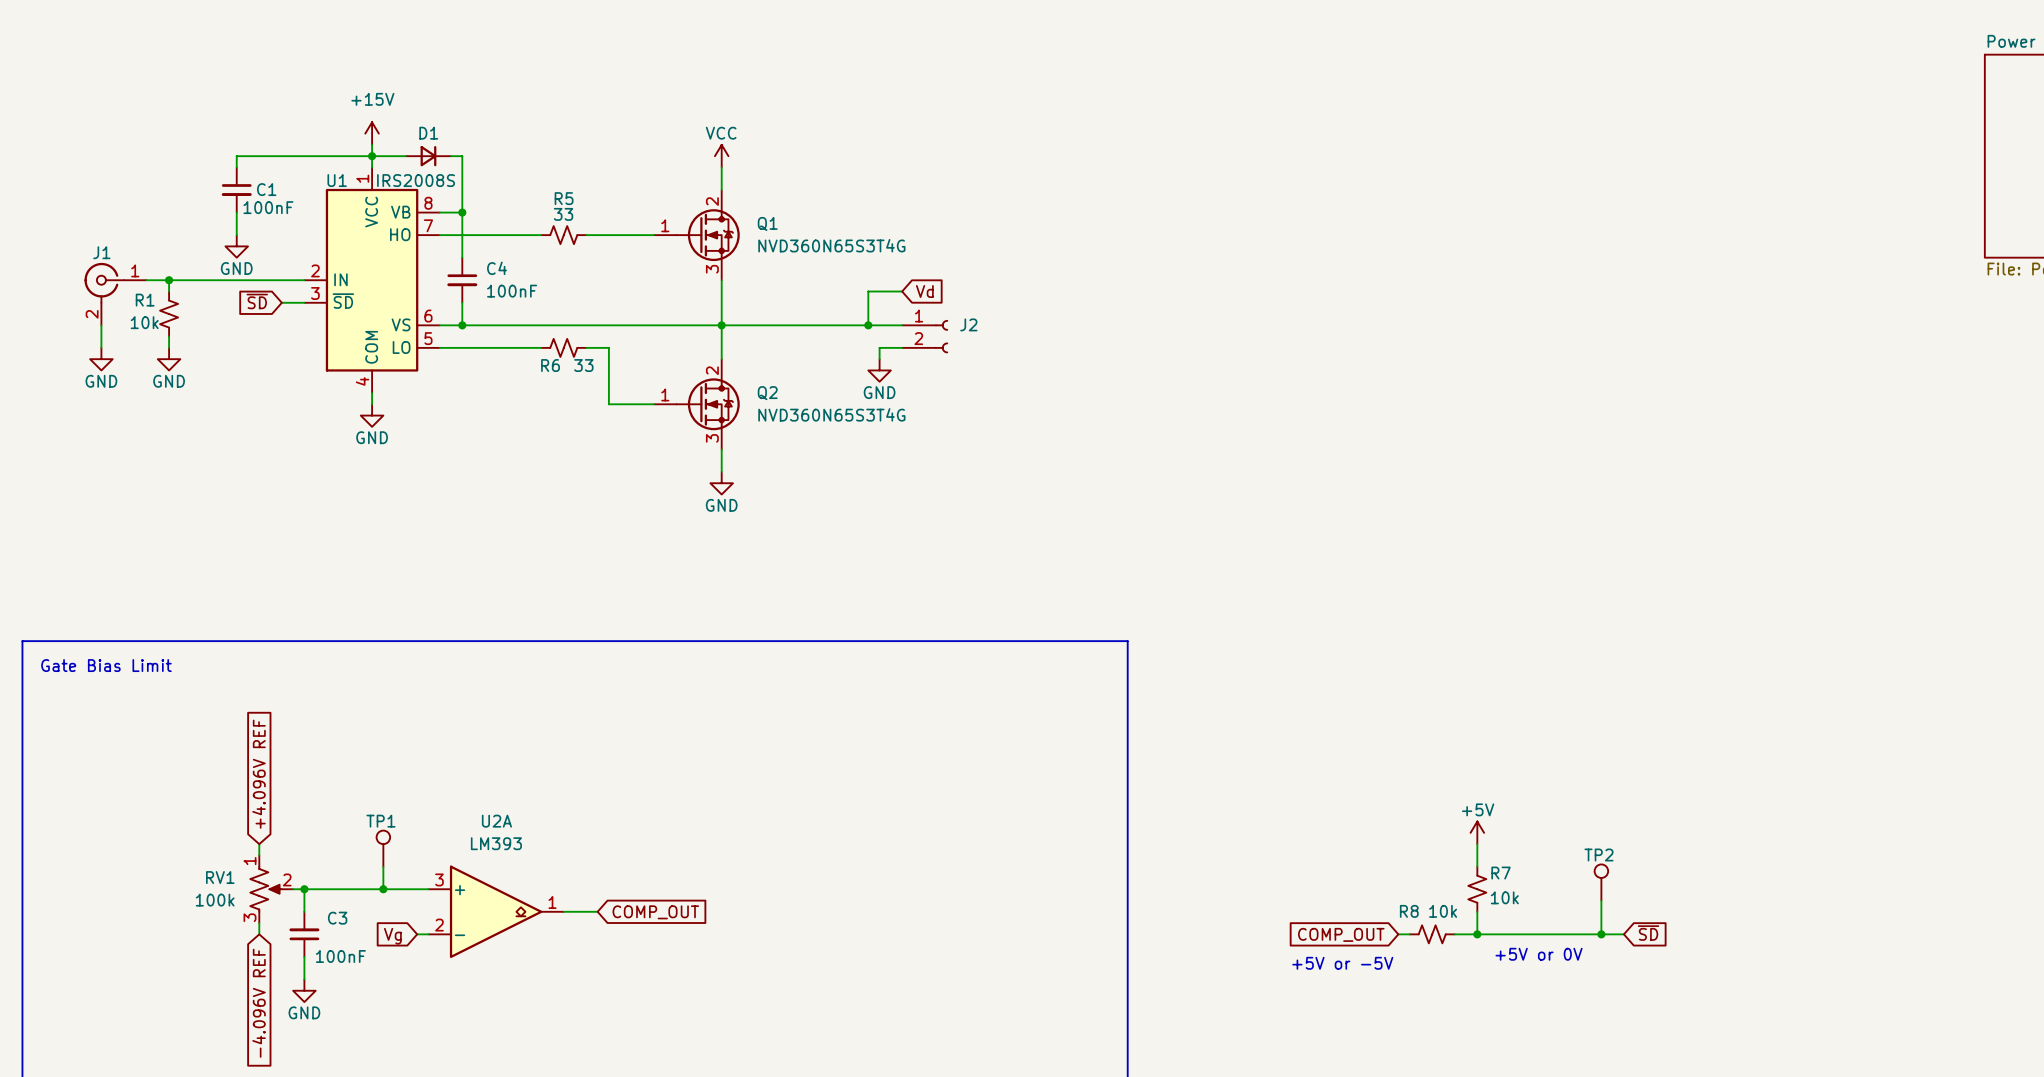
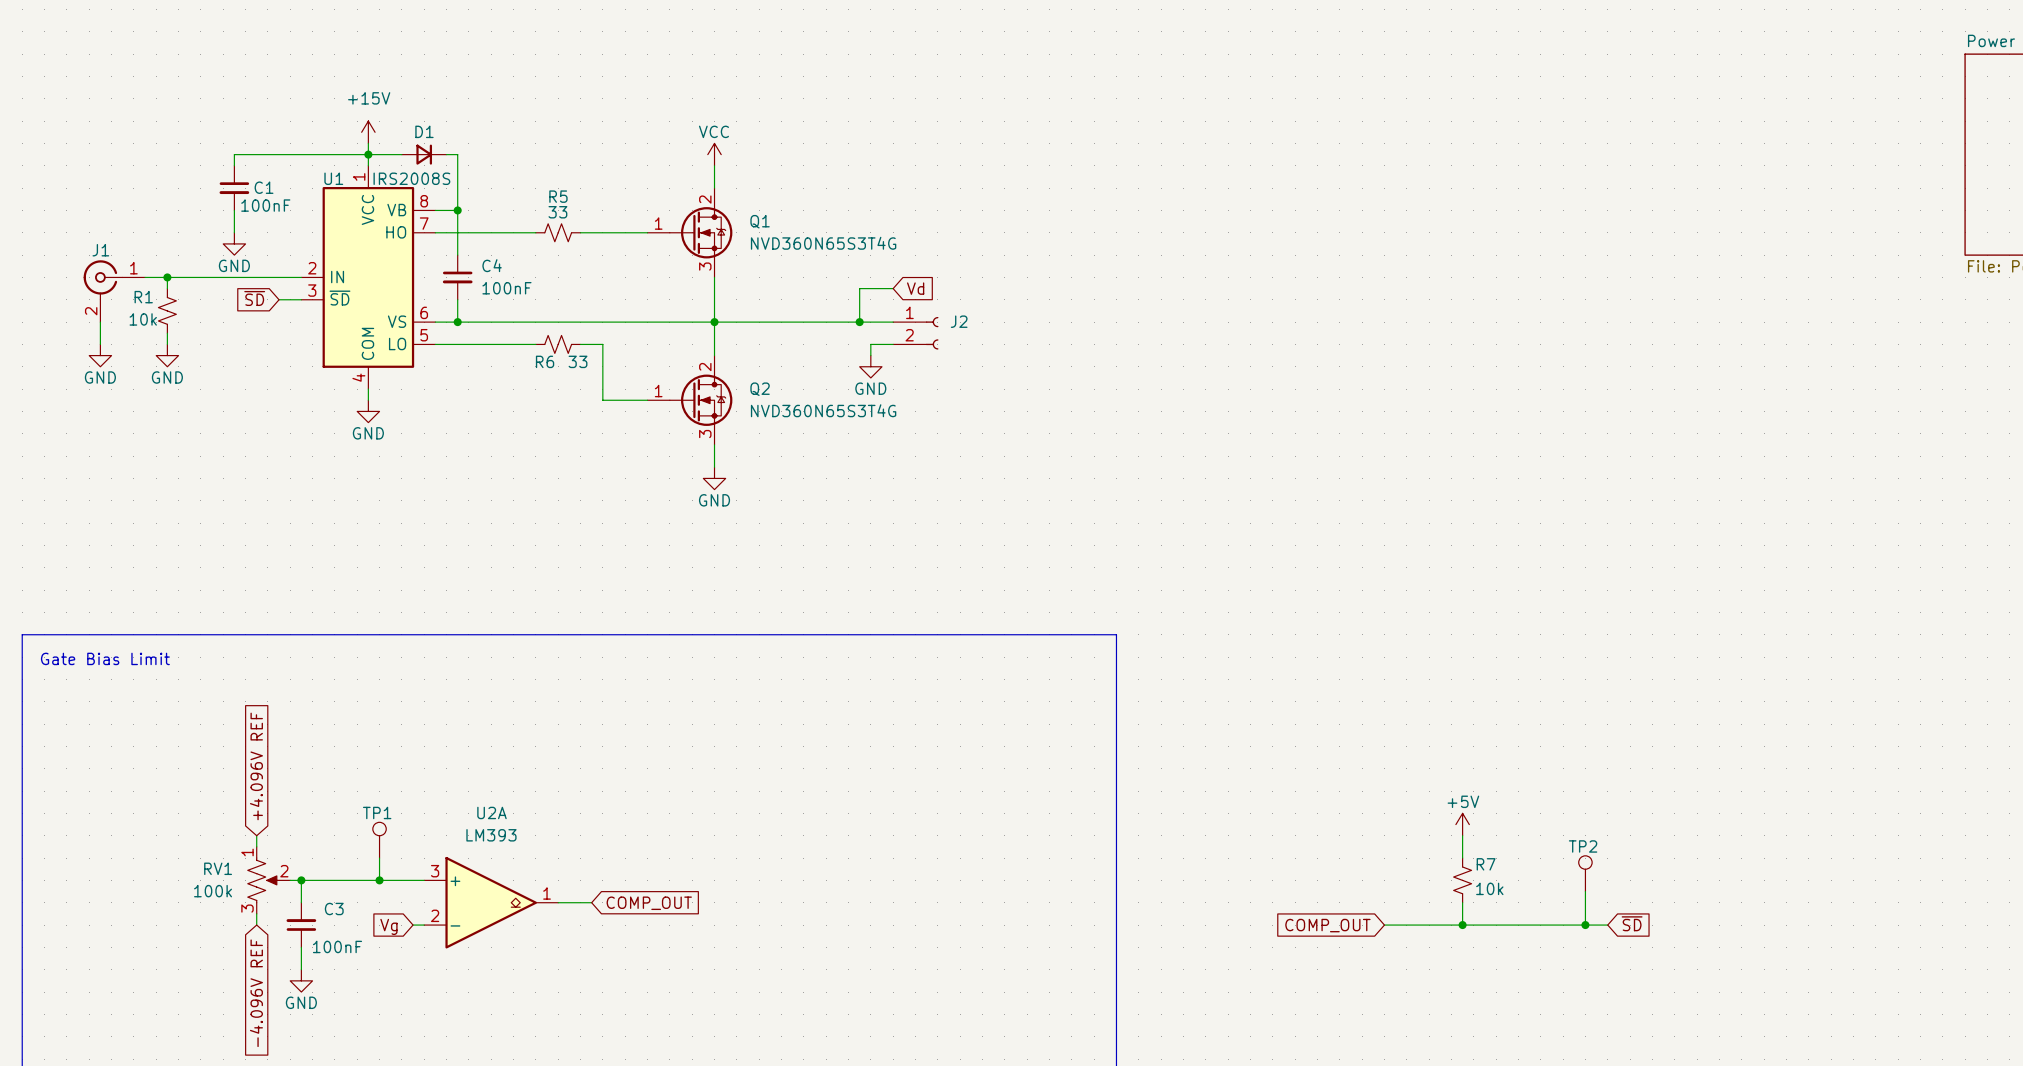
R8: 10k (1432, 934) -> none
text: +5V or 0V (1539, 954) -> none
text: +5V or -5V (1342, 963) -> none

